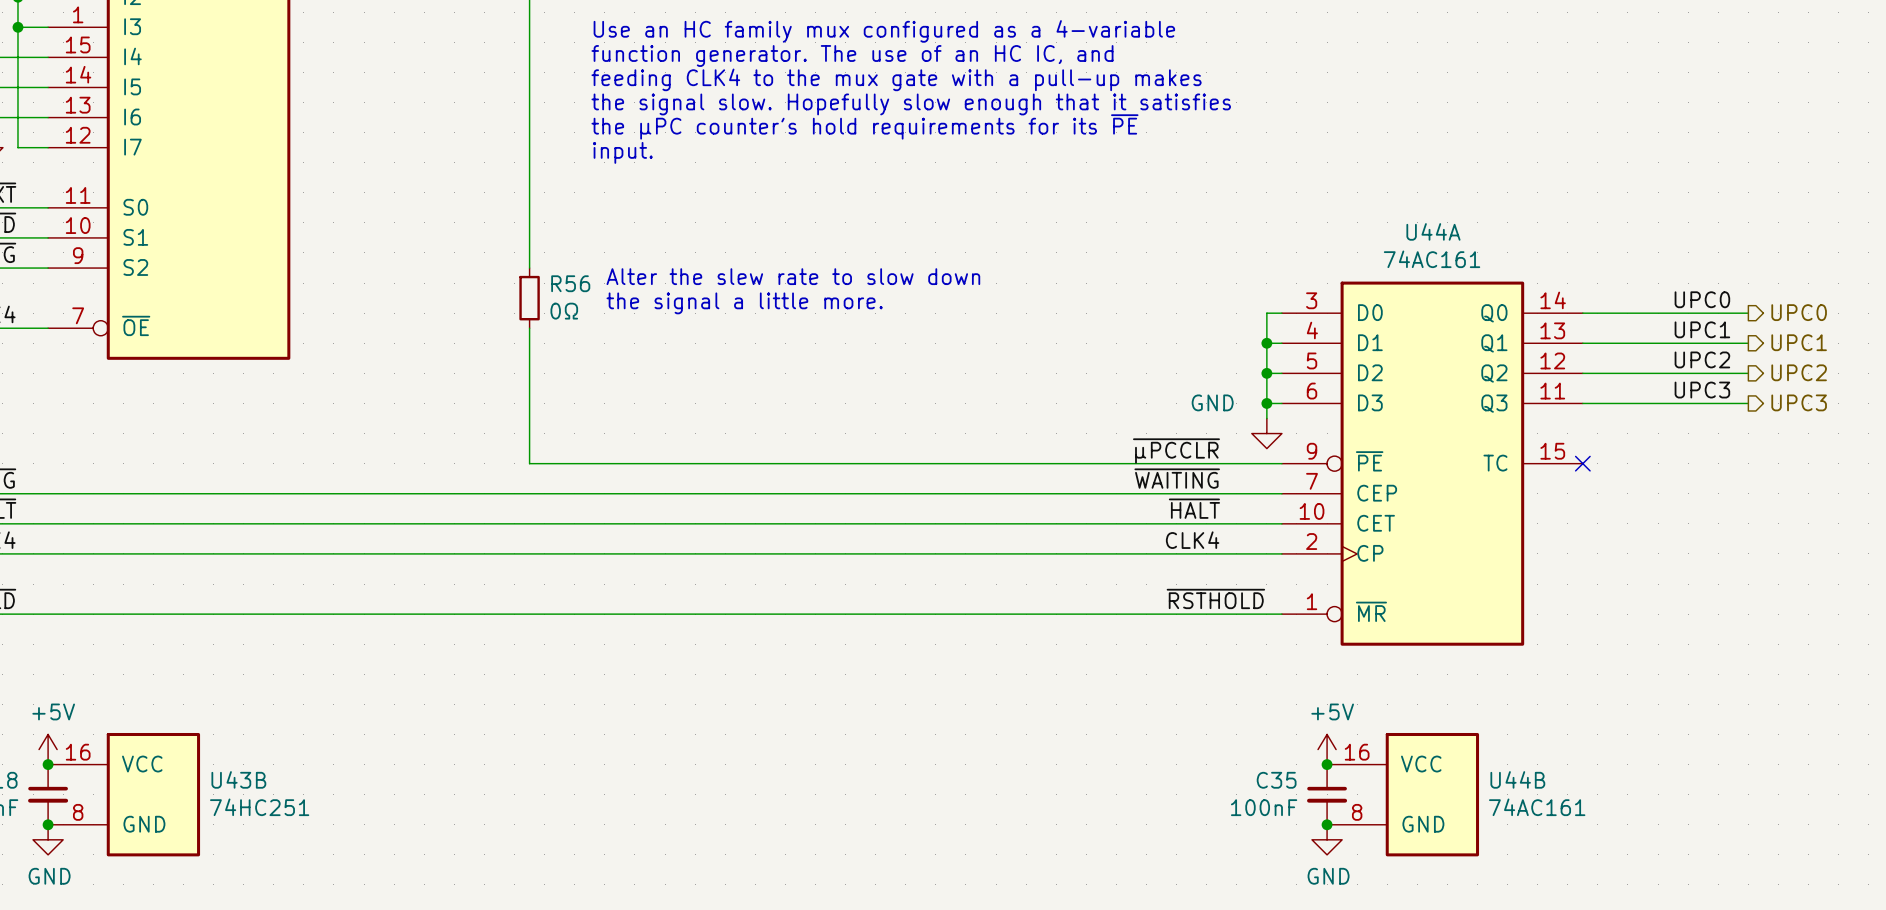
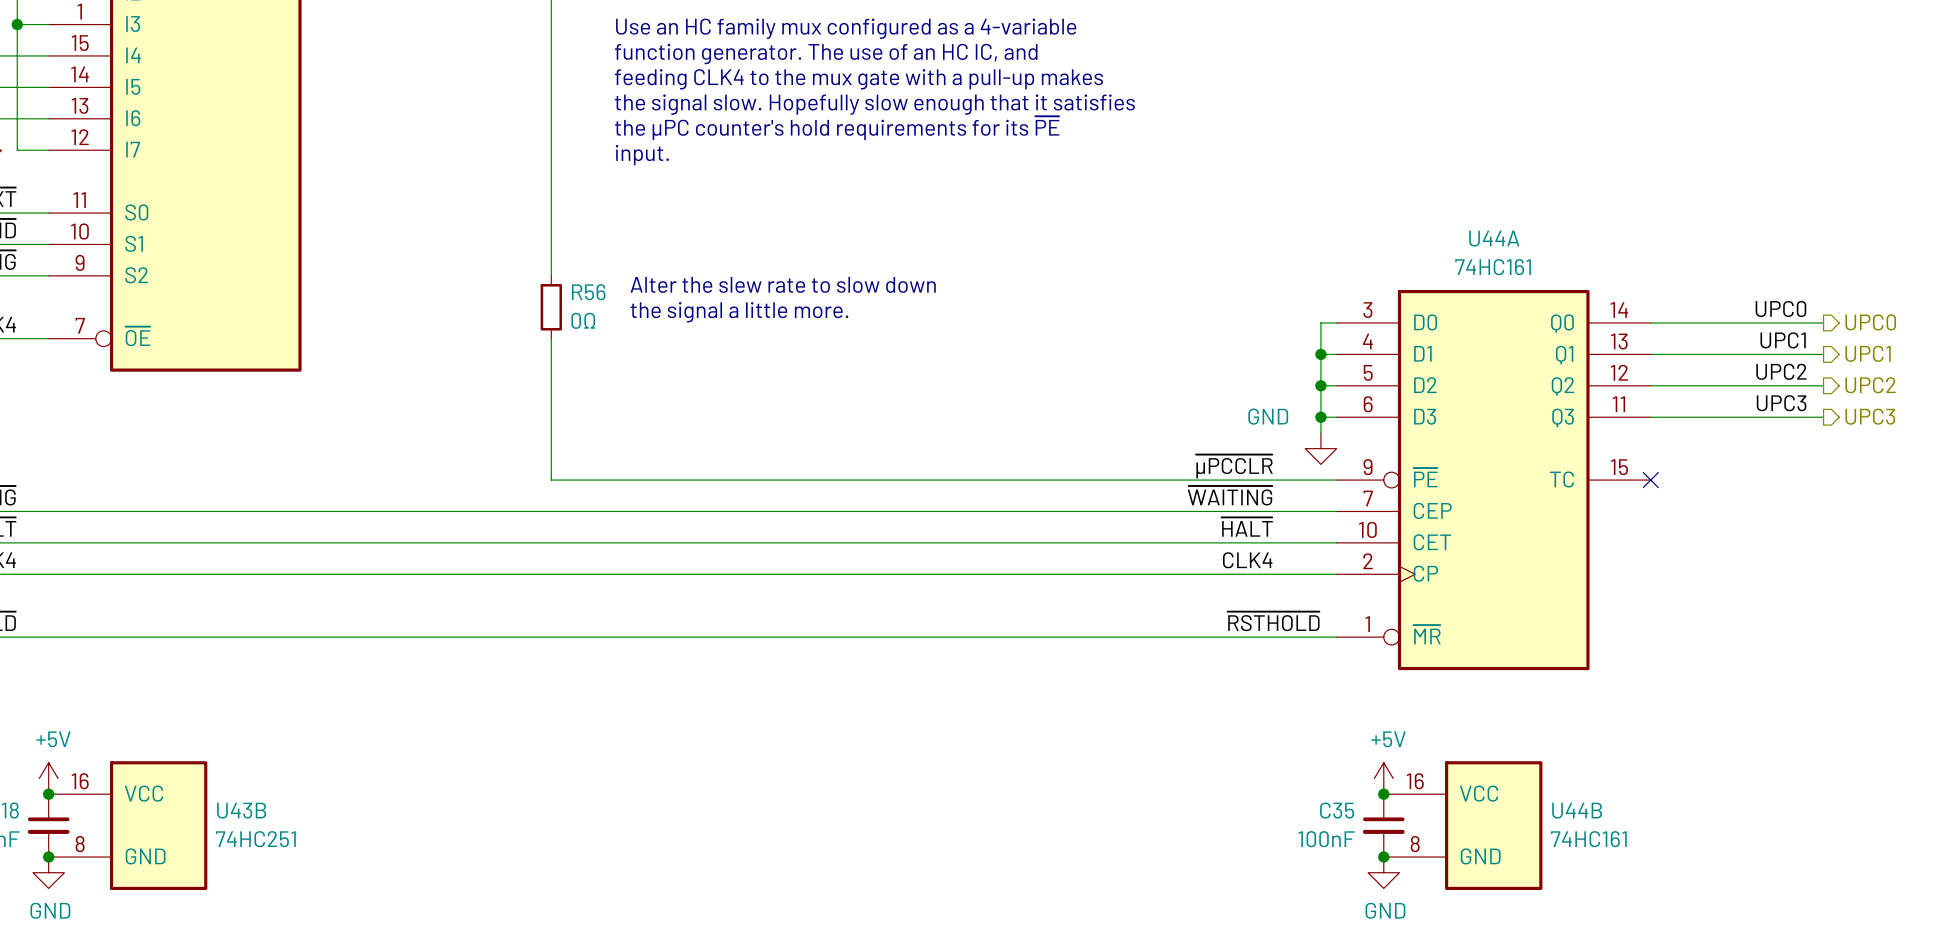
U44A value: 74AC161 (1432, 259) -> 74HC161 (1493, 267)
U44B value: 74AC161 (1537, 807) -> 74HC161 (1588, 839)

